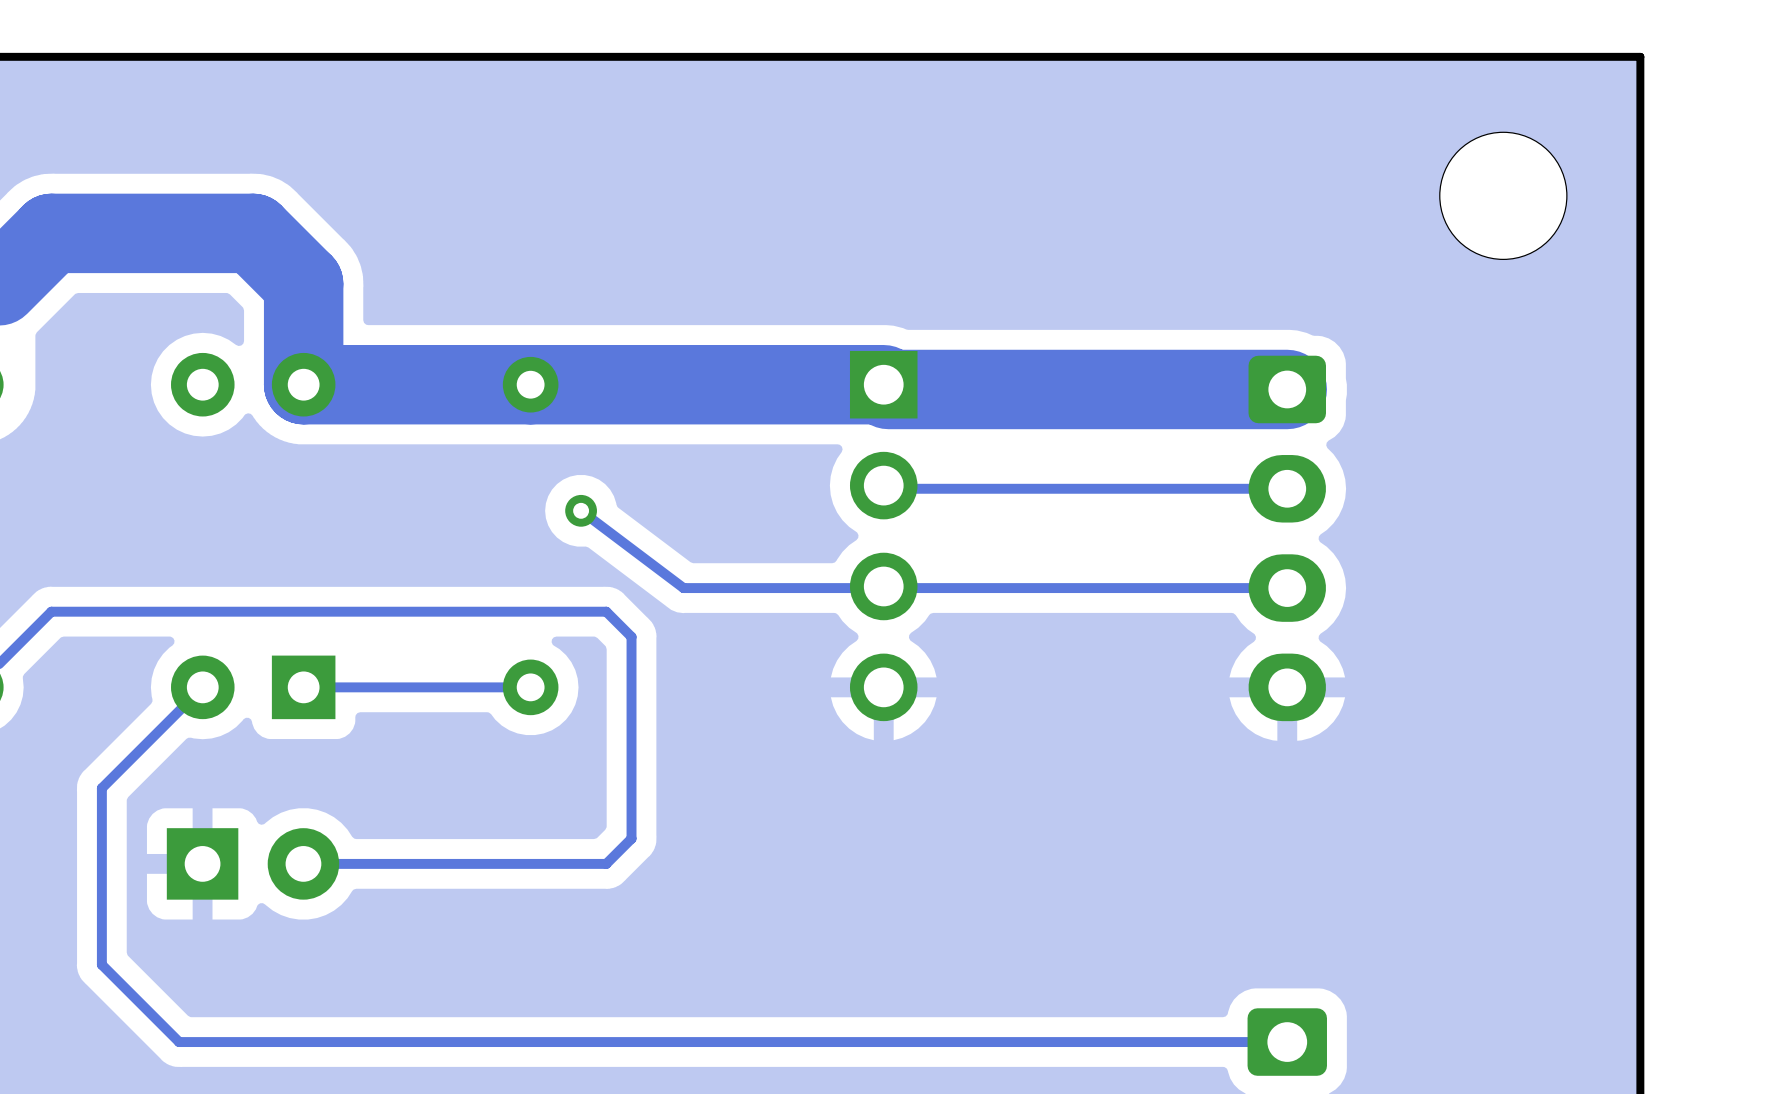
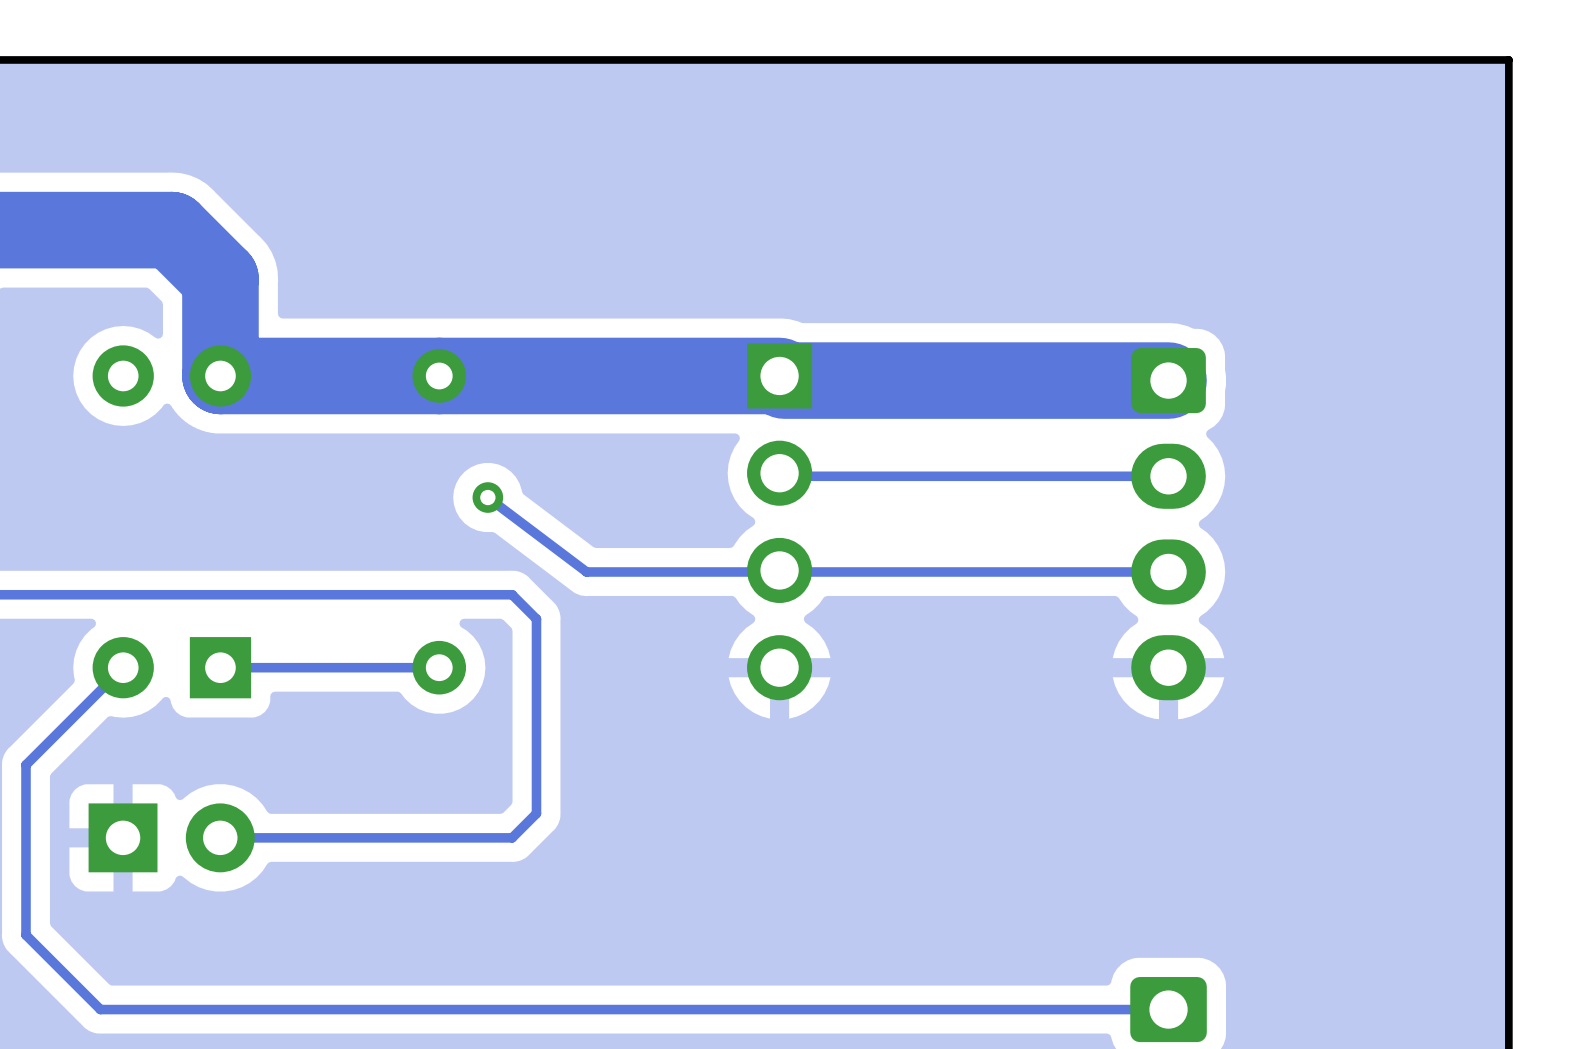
part: (1503, 195) -> none

